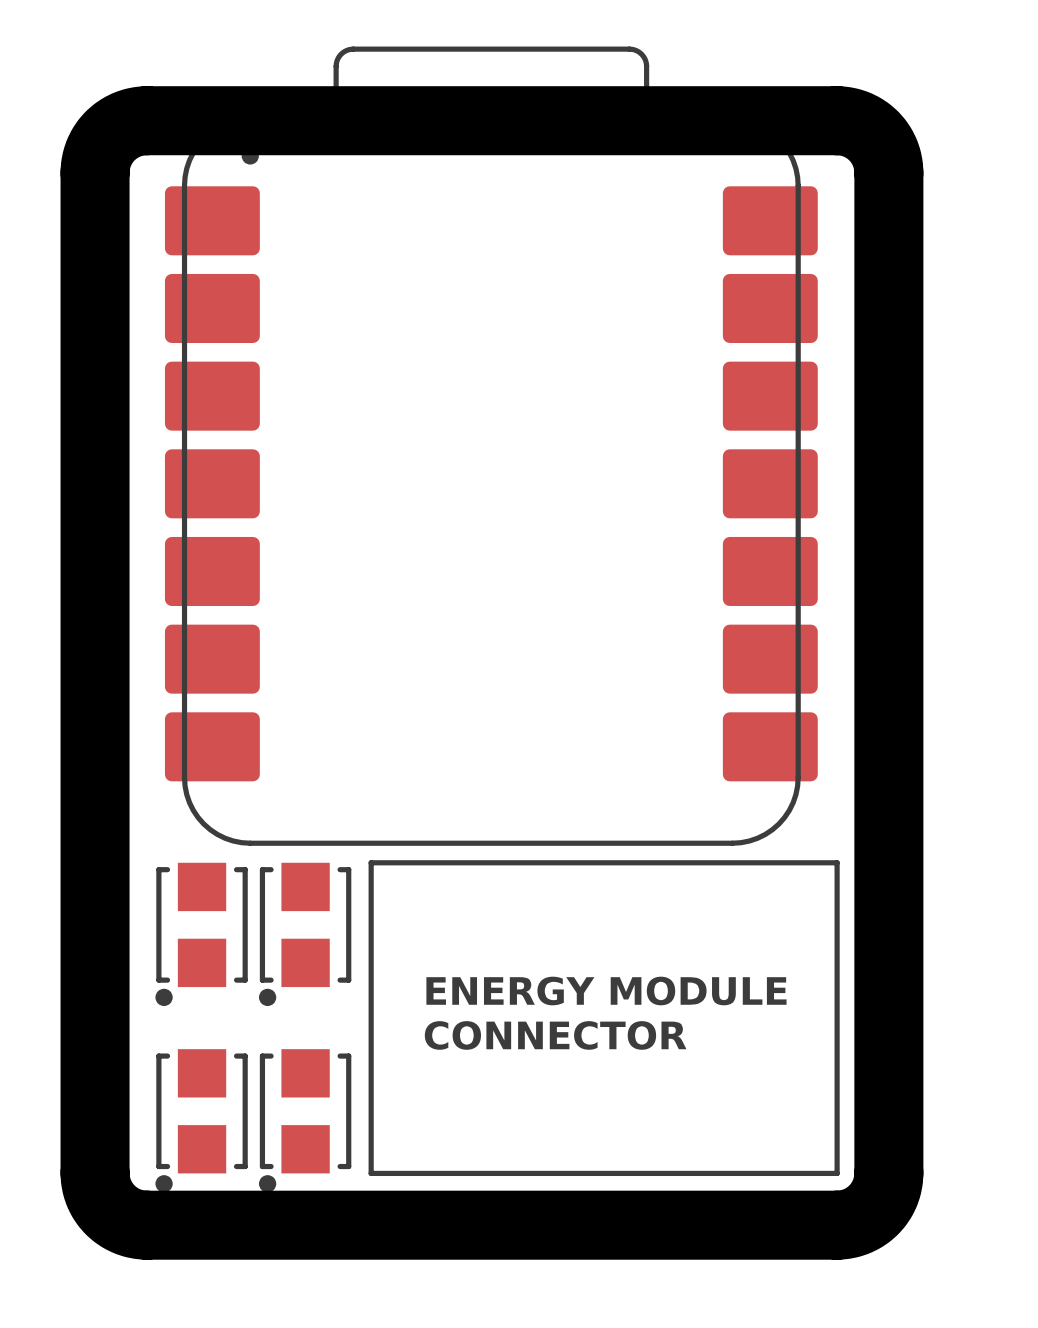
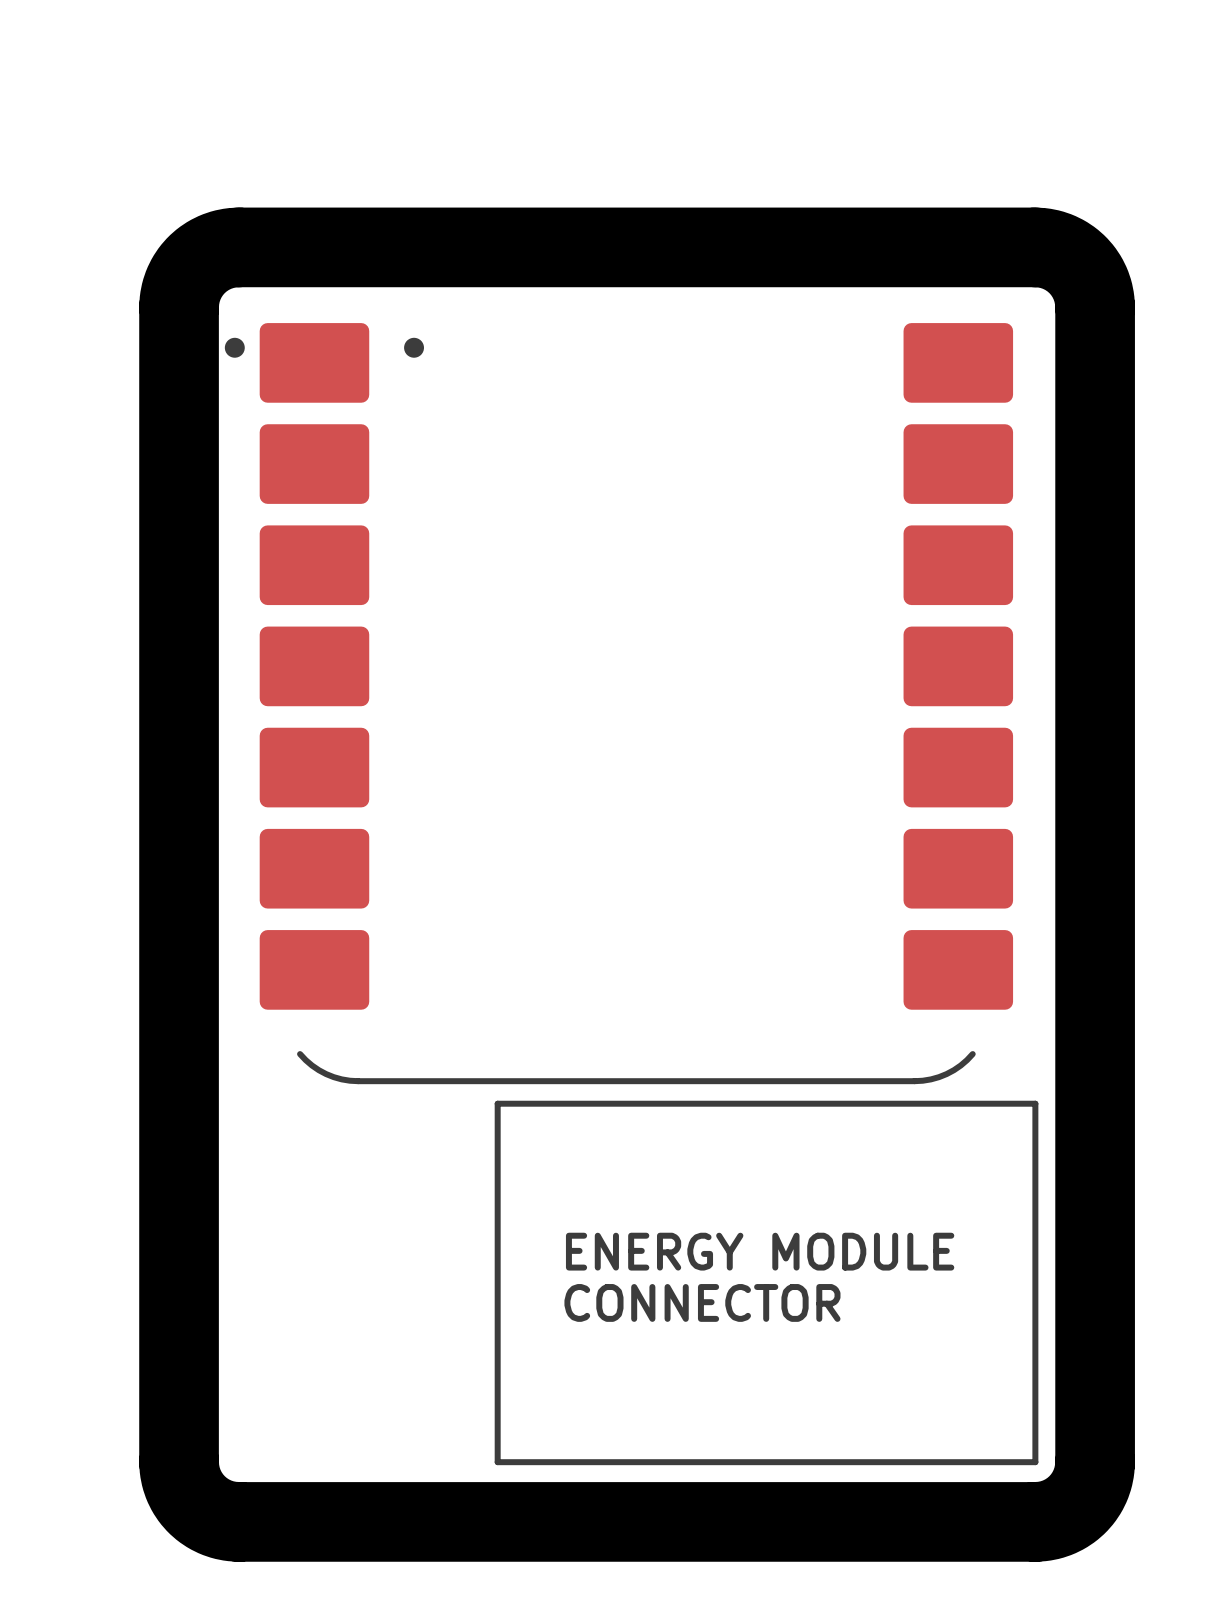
part: (491, 446) -> none
part: none -> (618, 703)
part: (201, 934) -> none
part: (305, 934) -> none
part: (201, 1120) -> none
part: (305, 1120) -> none

